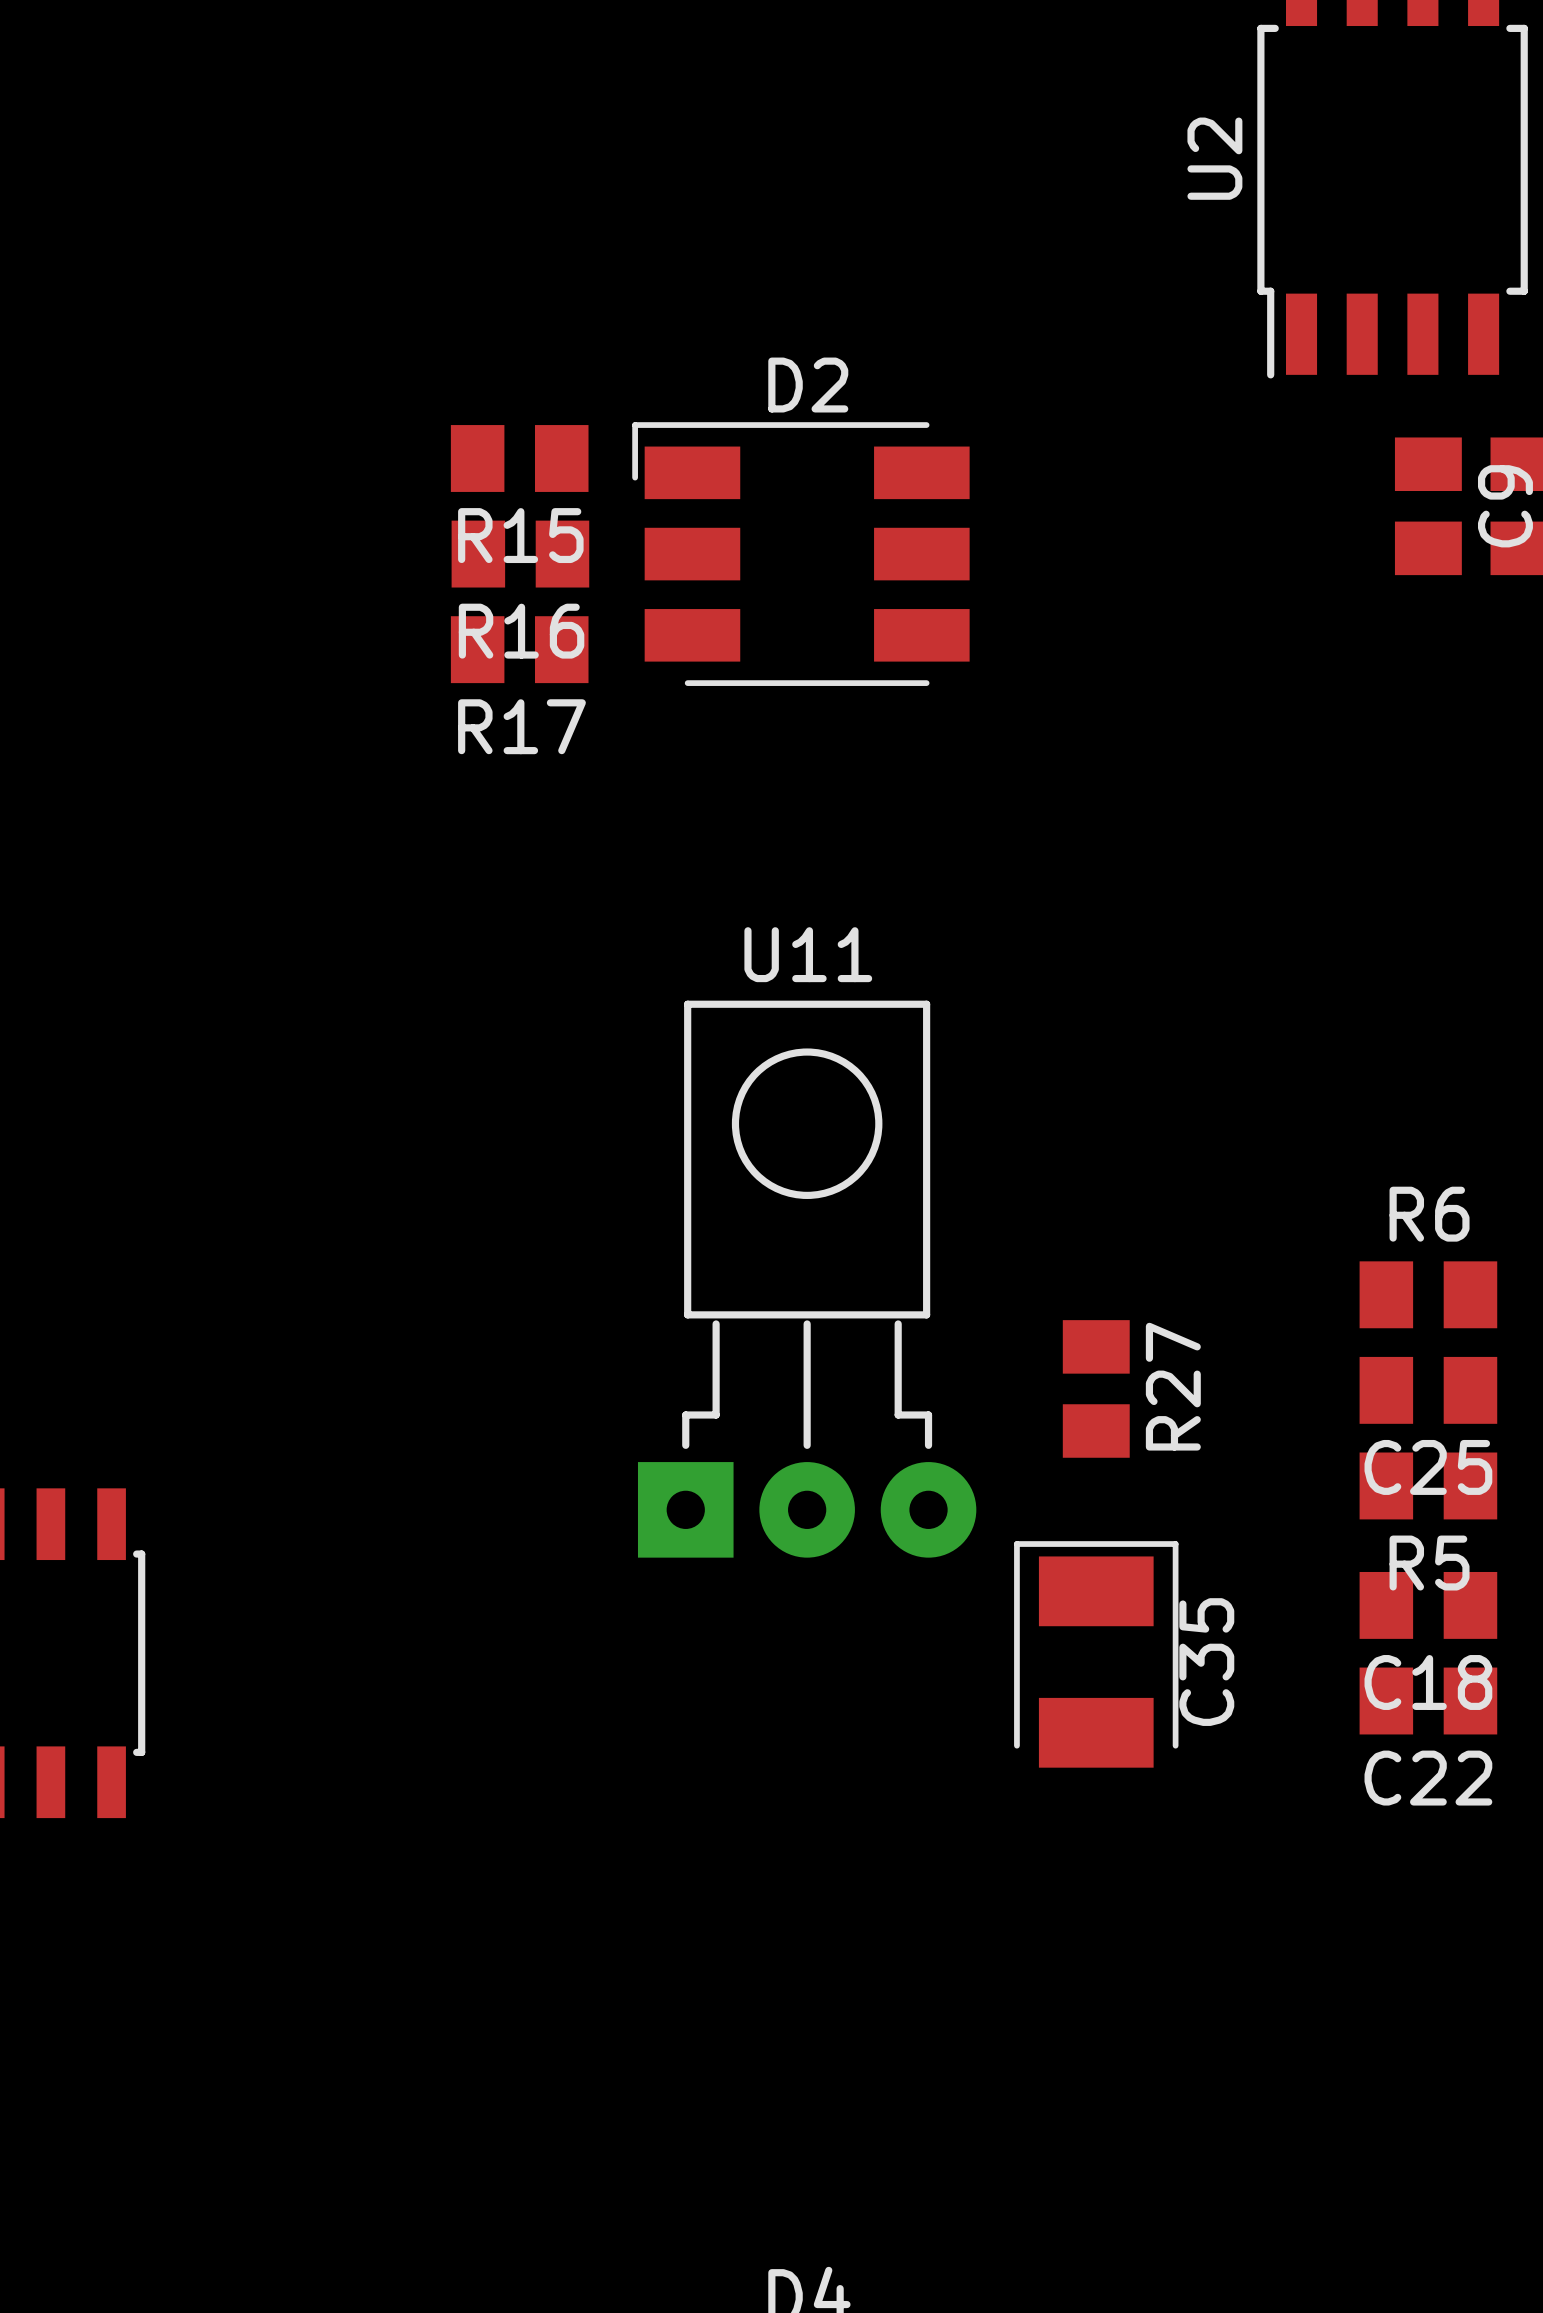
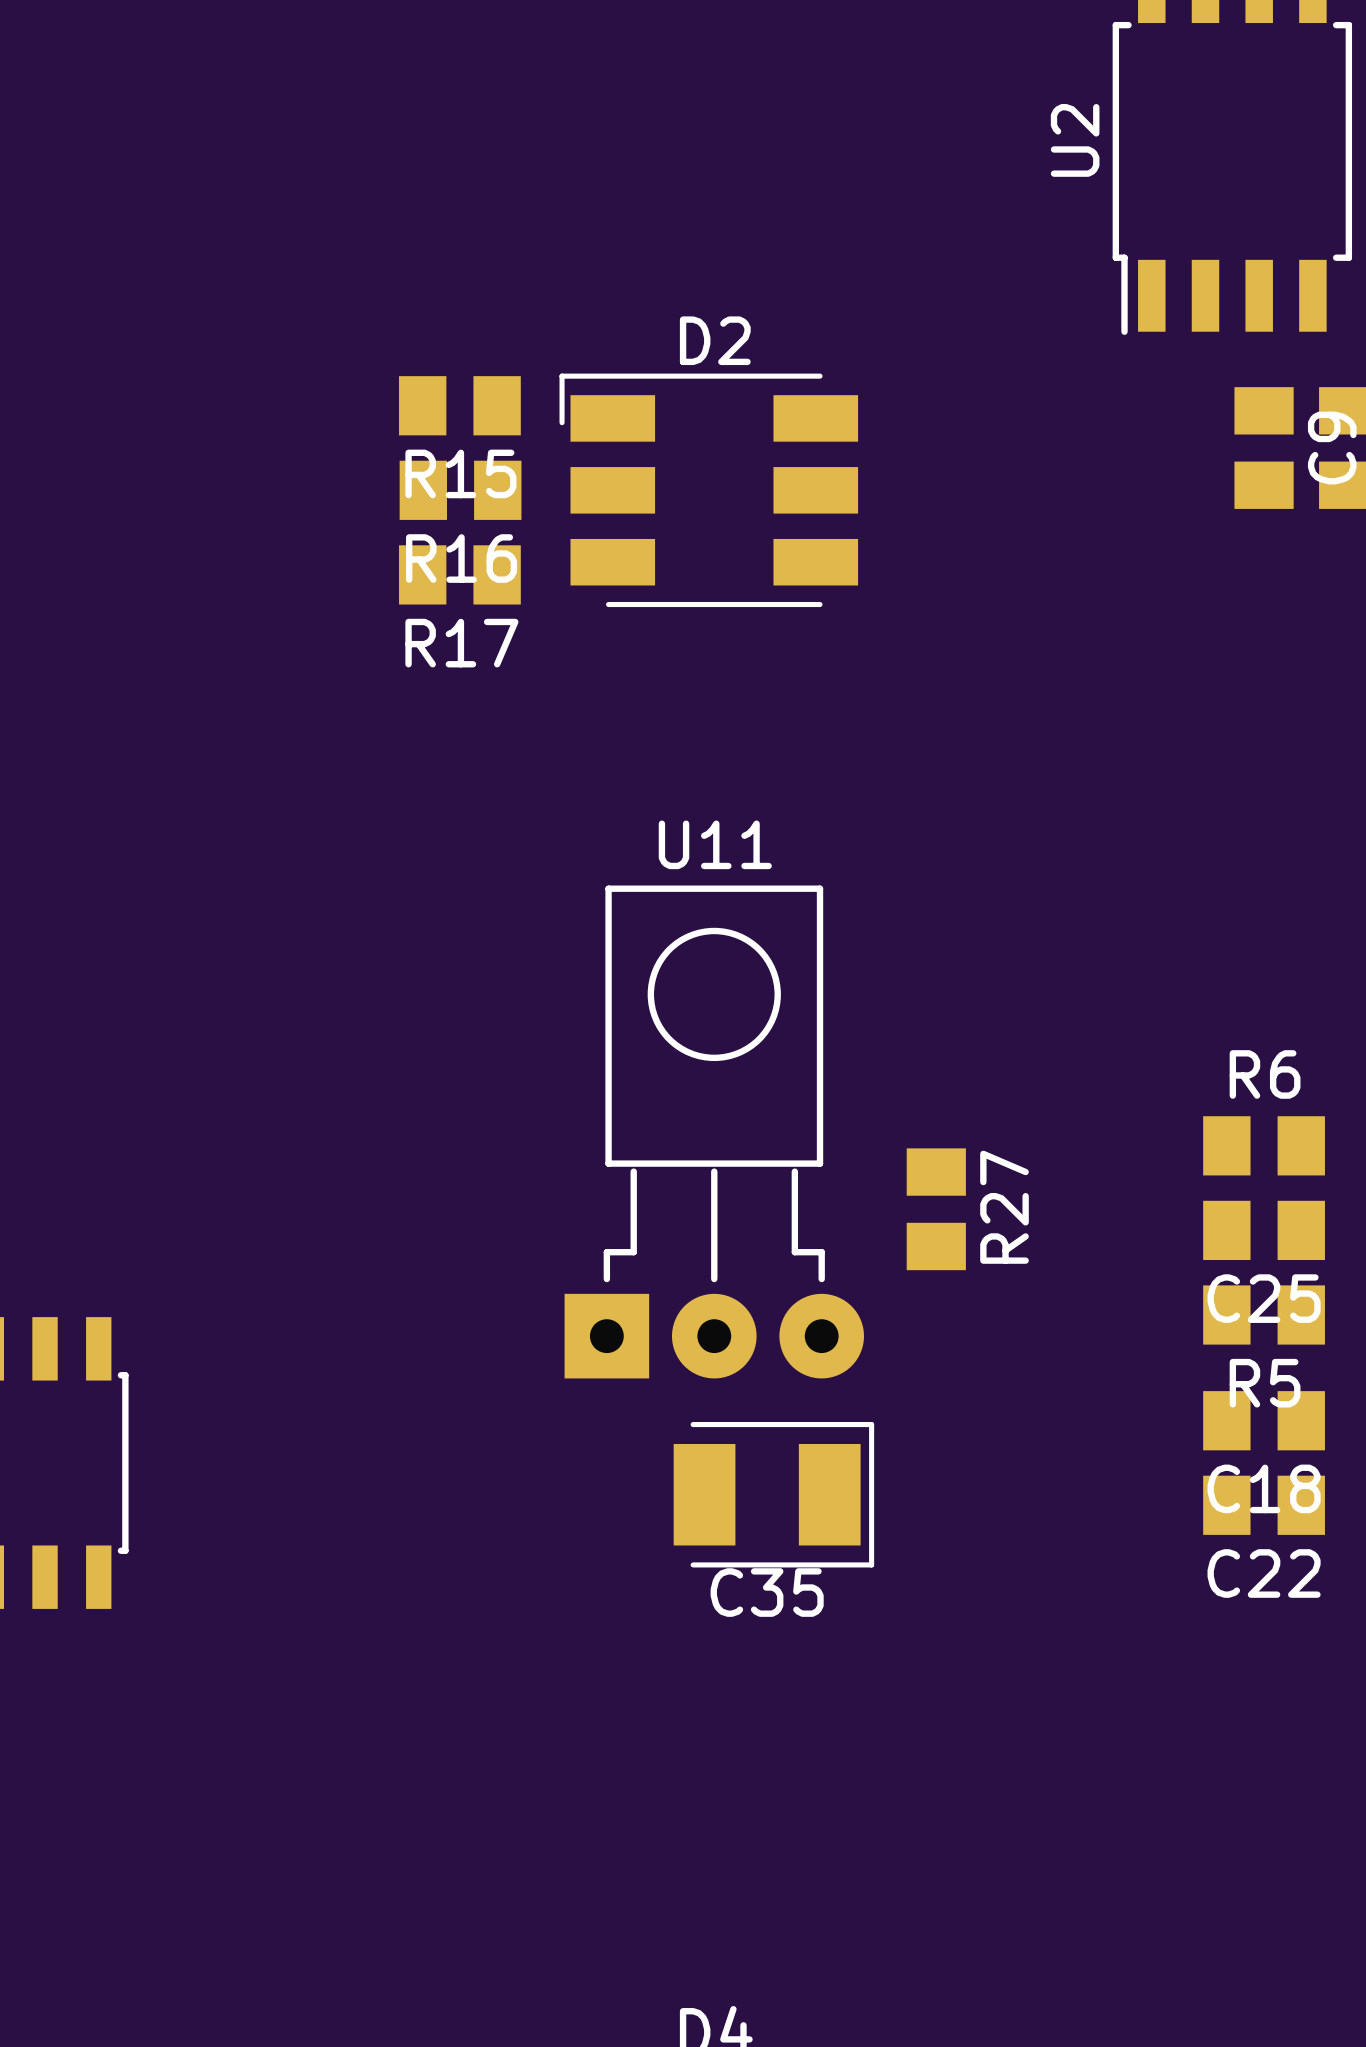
R27 position: (1096, 1388) -> (936, 1209)
C35 rotation: 0° (1096, 1654) -> 90° clockwise (773, 1494)
C35 position: (1096, 1654) -> (773, 1494)

